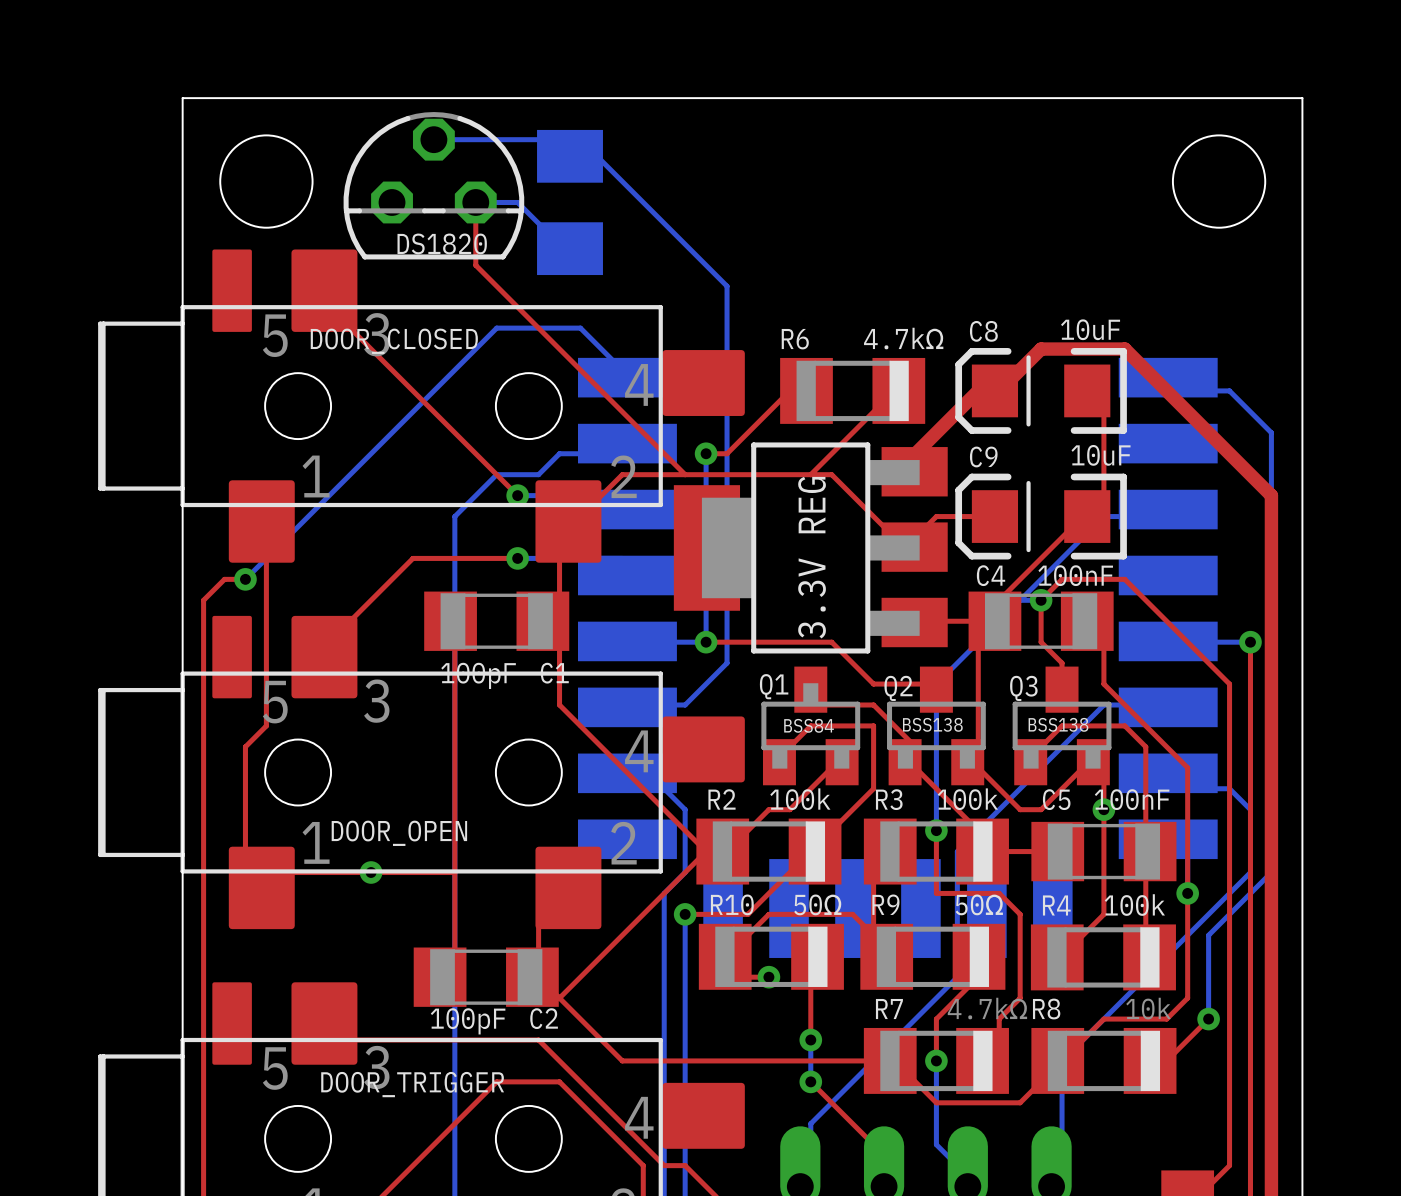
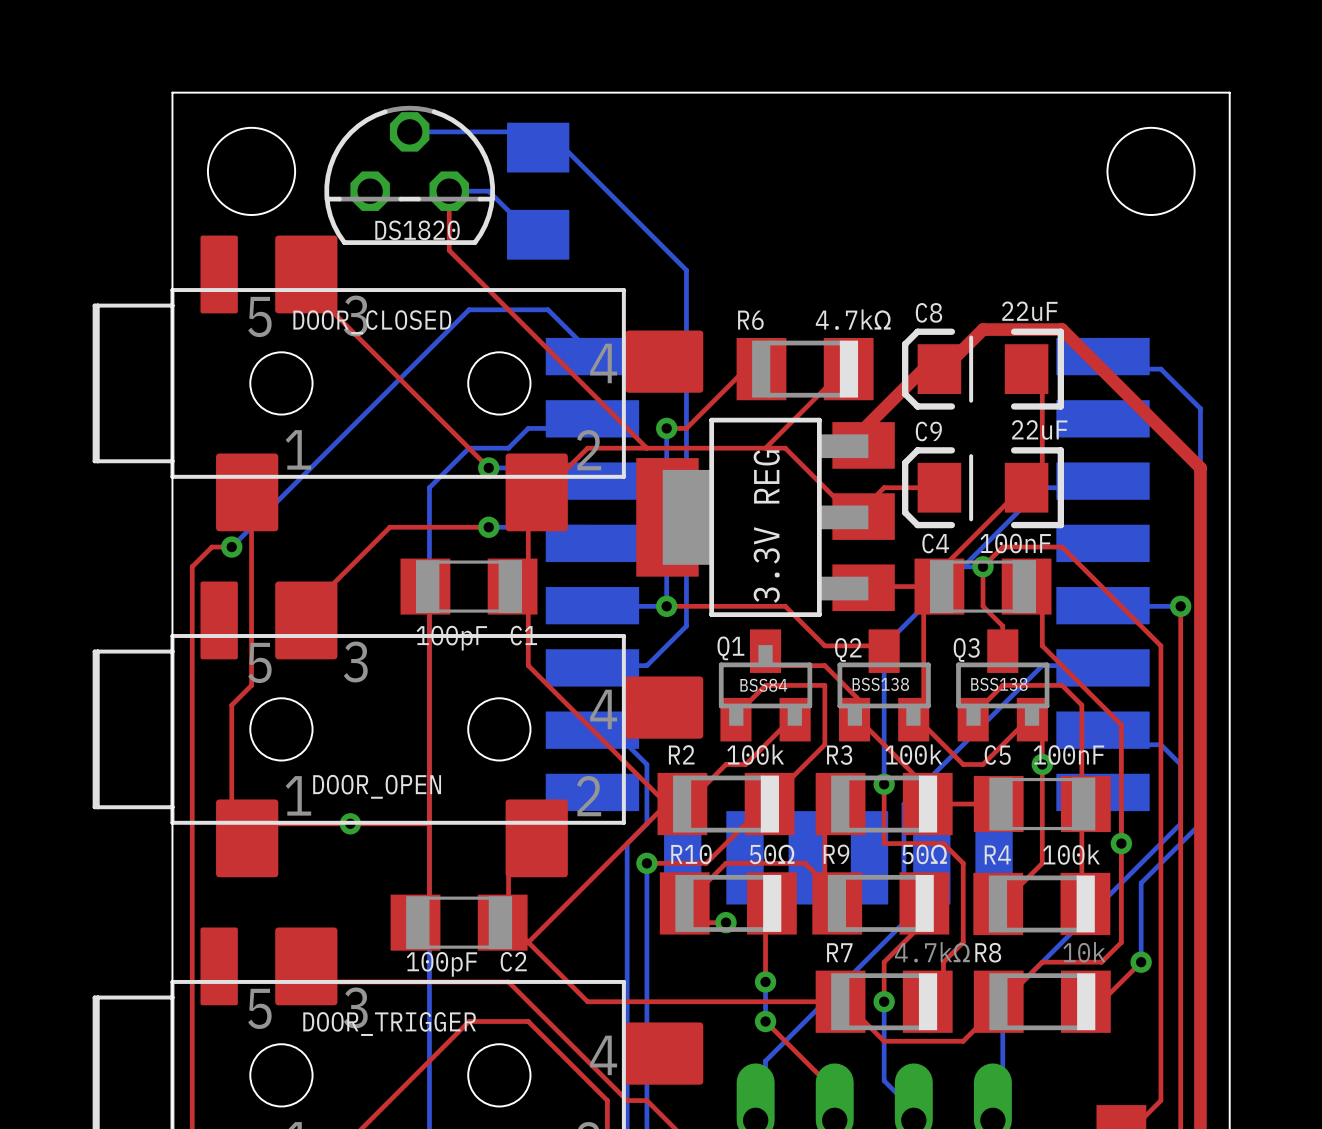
C8 value: 10uF (1090, 329) -> 22uF (1029, 311)
C9 value: 10uF (1101, 455) -> 22uF (1039, 429)

